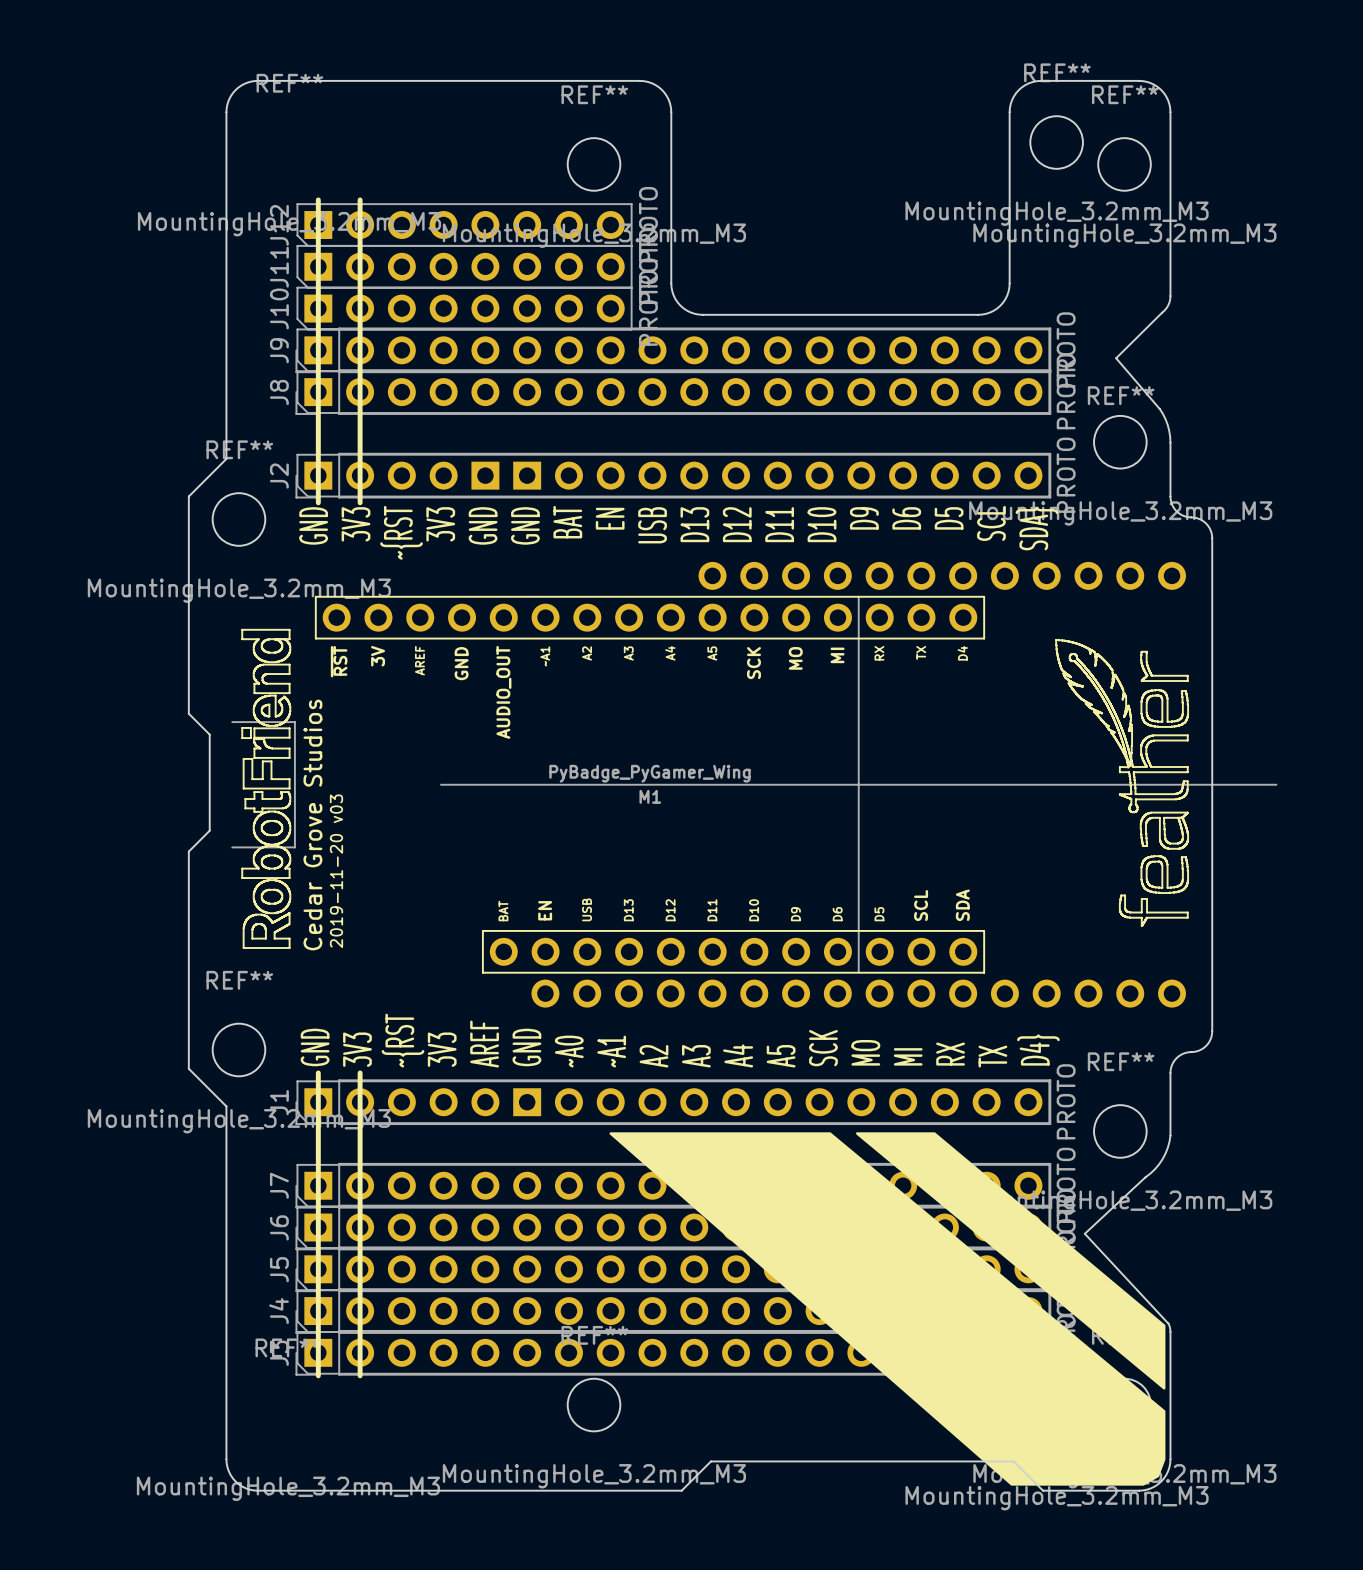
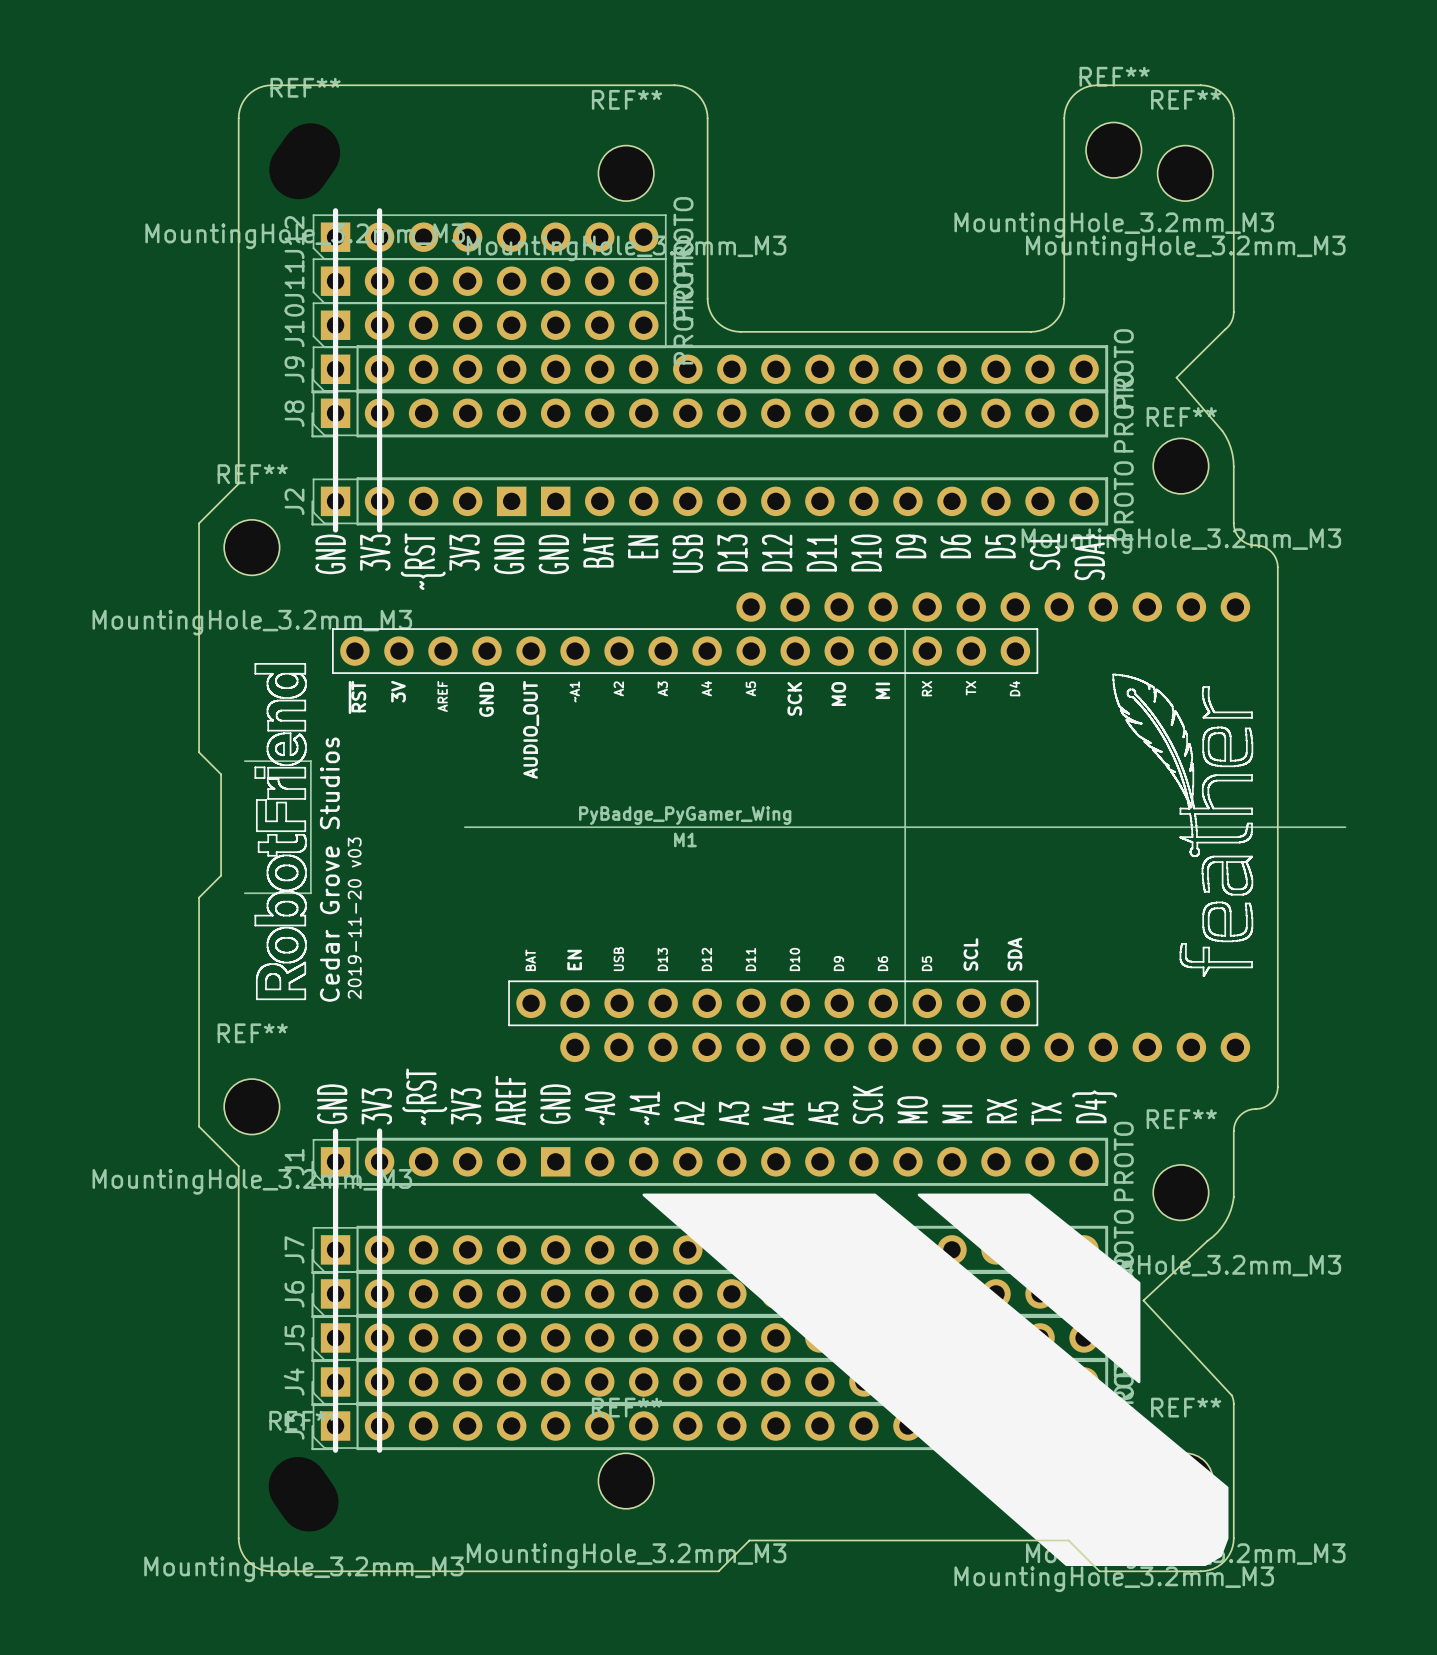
drawing: [855, 1132, 1166, 1390] -> none
drawing: none -> [917, 1193, 1141, 1384]

